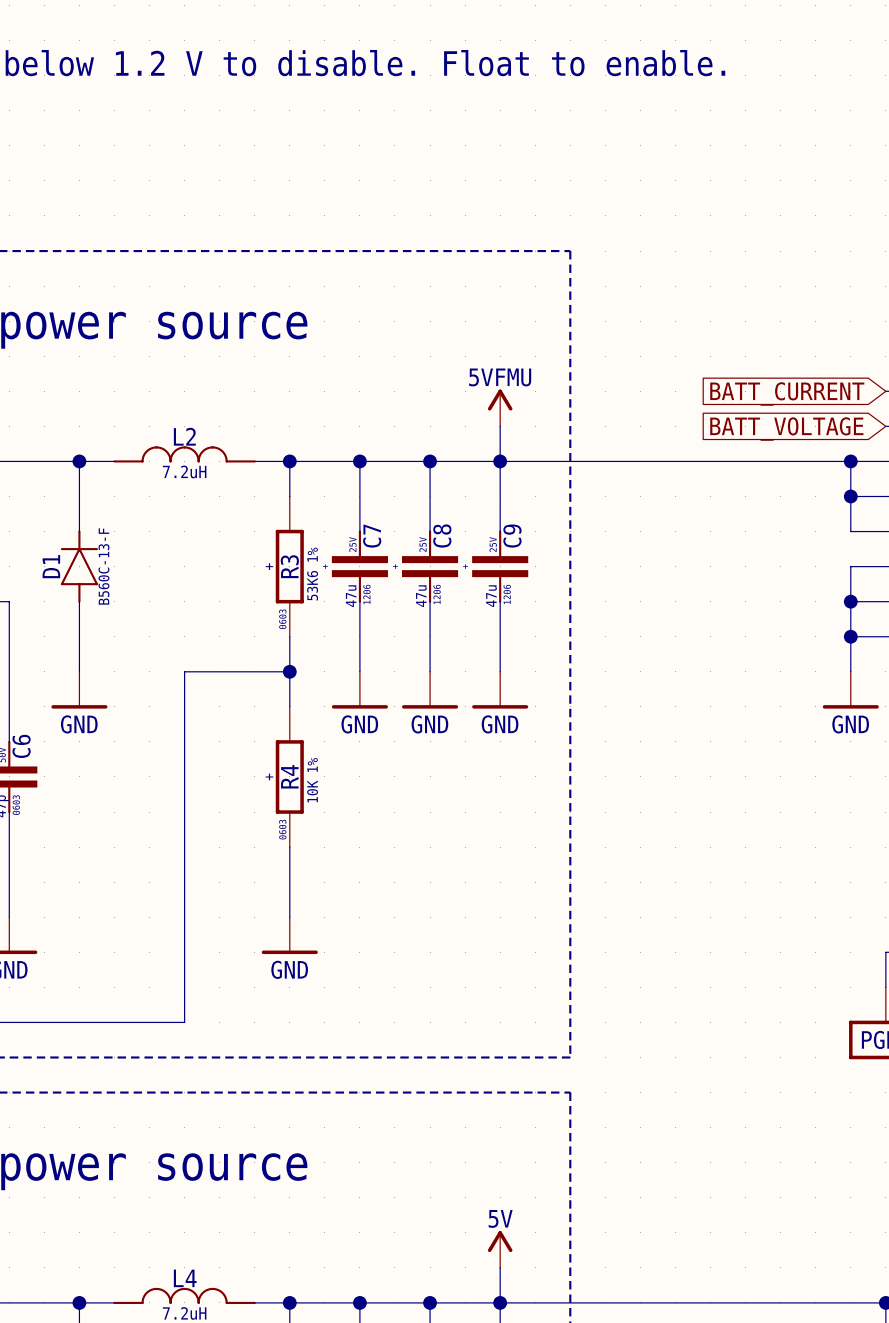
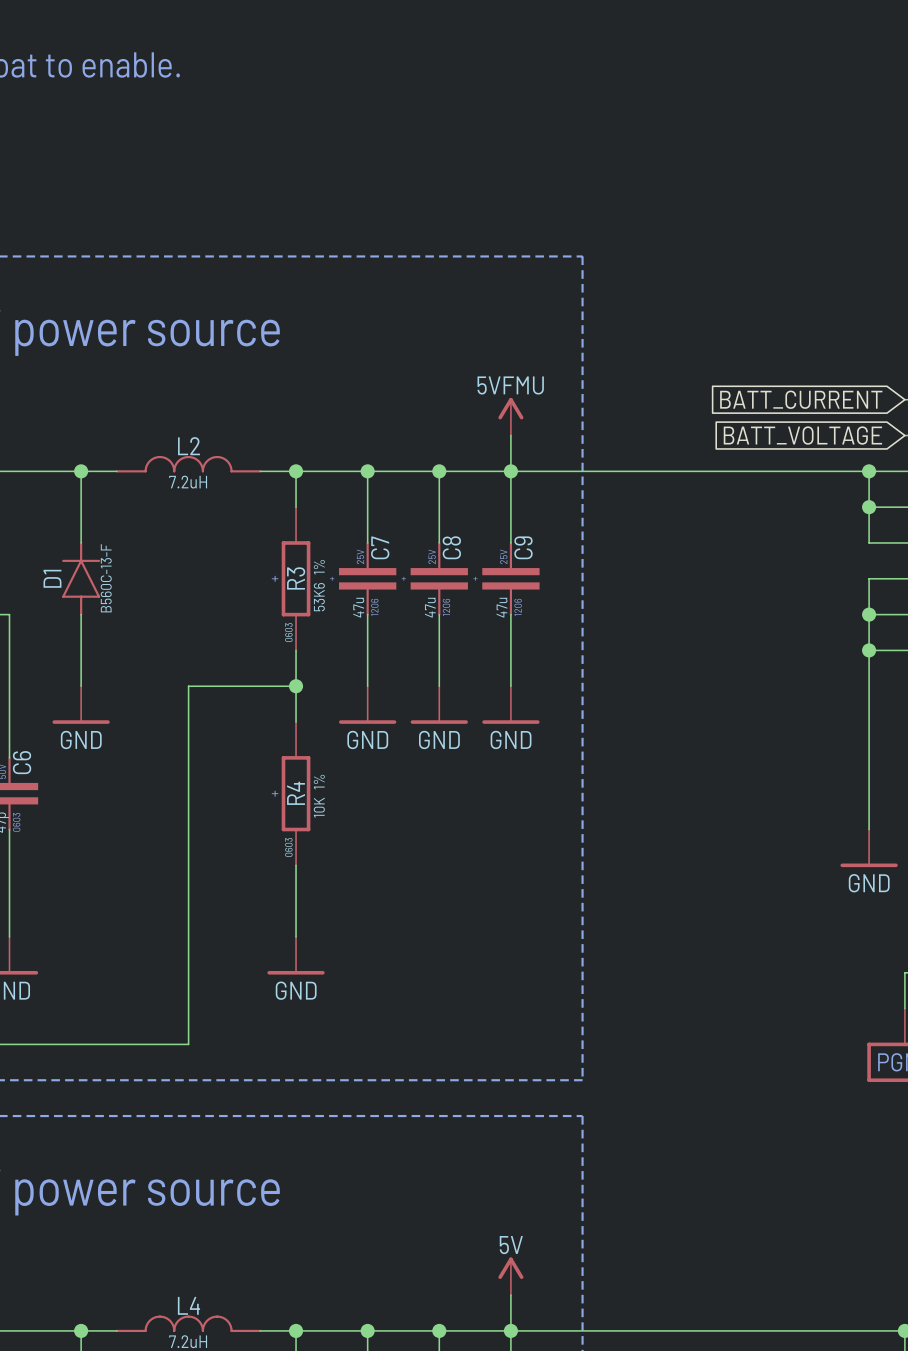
wire: none -> (869, 686) (869, 829)
power symbol position: GND (850, 690) -> GND (869, 848)

